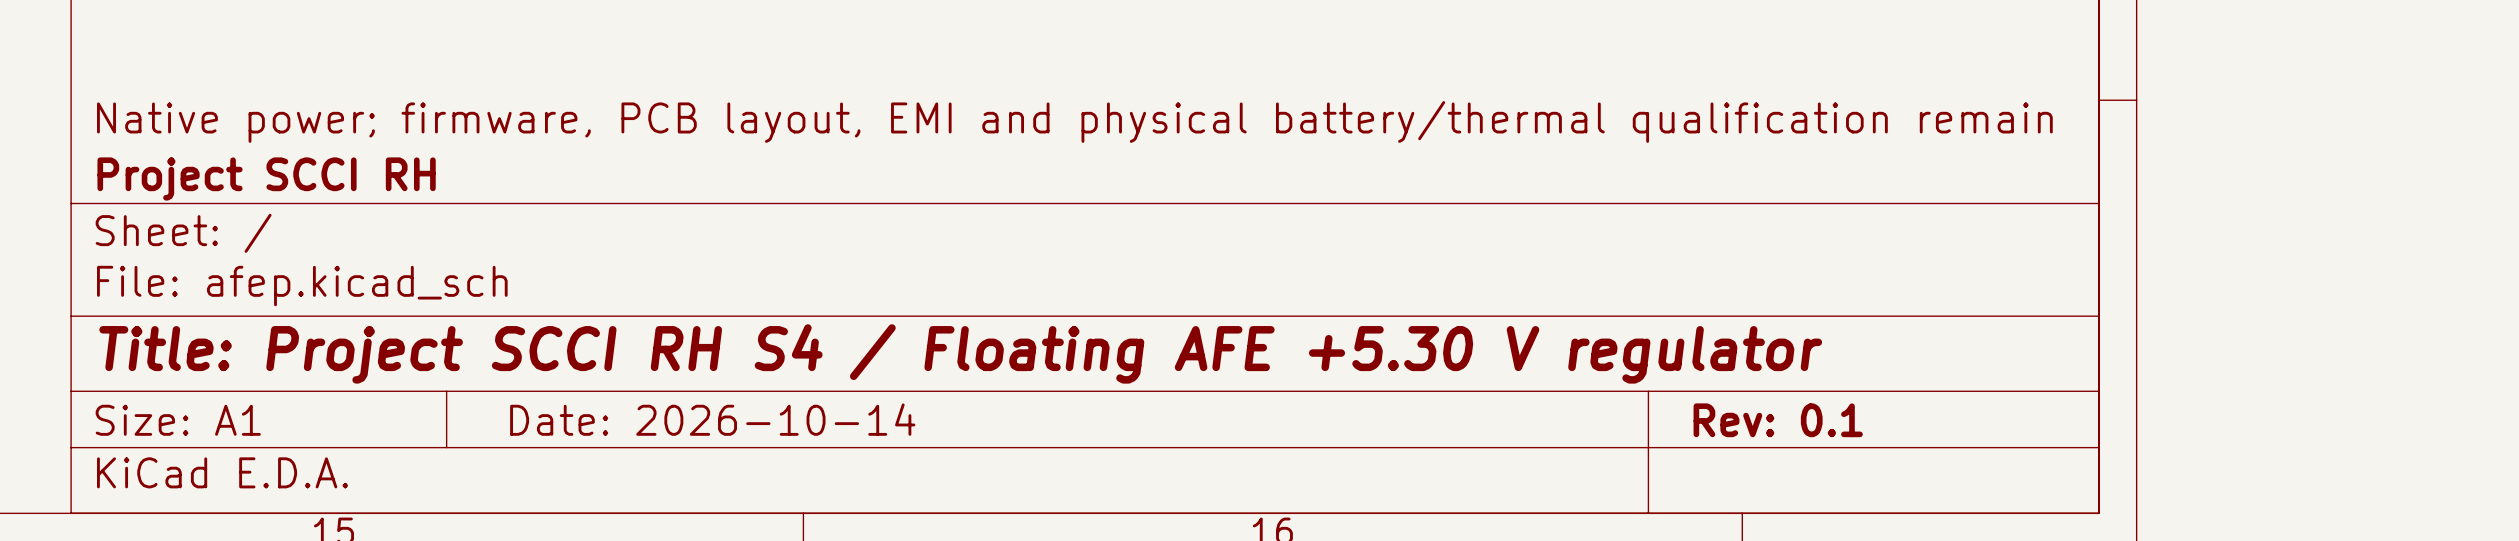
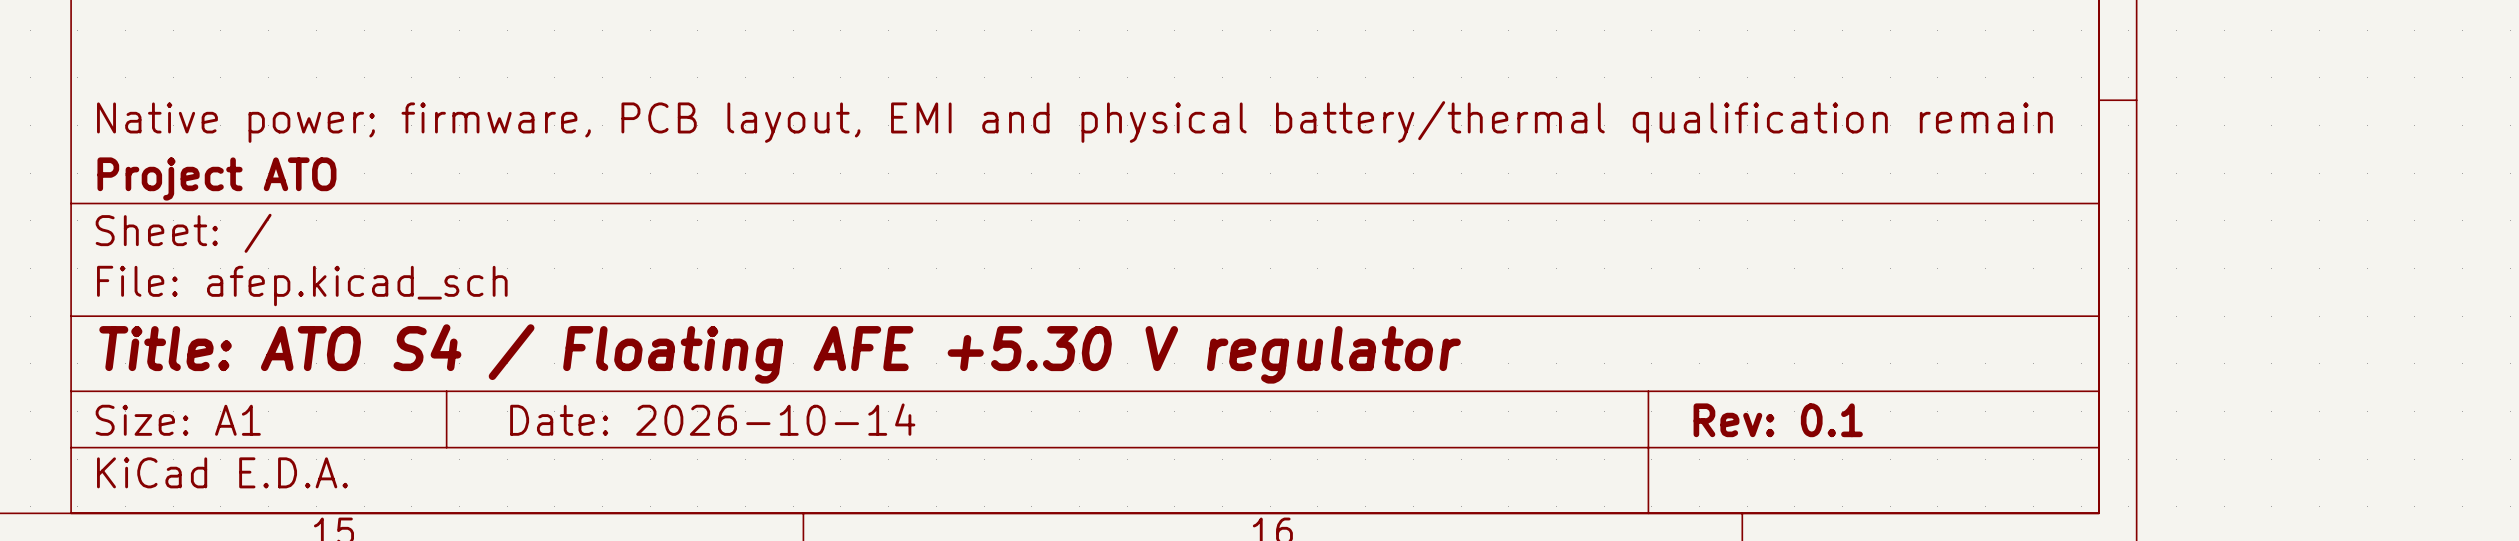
title block: Project SCCI RH (266, 178) -> Project ATO (216, 178)
title block: Title: Project SCCI RH S4 / Floating AFE +5.30 V regulator (960, 353) -> Title: ATO S4 / Floating AFE +5.30 V regulator (780, 353)

